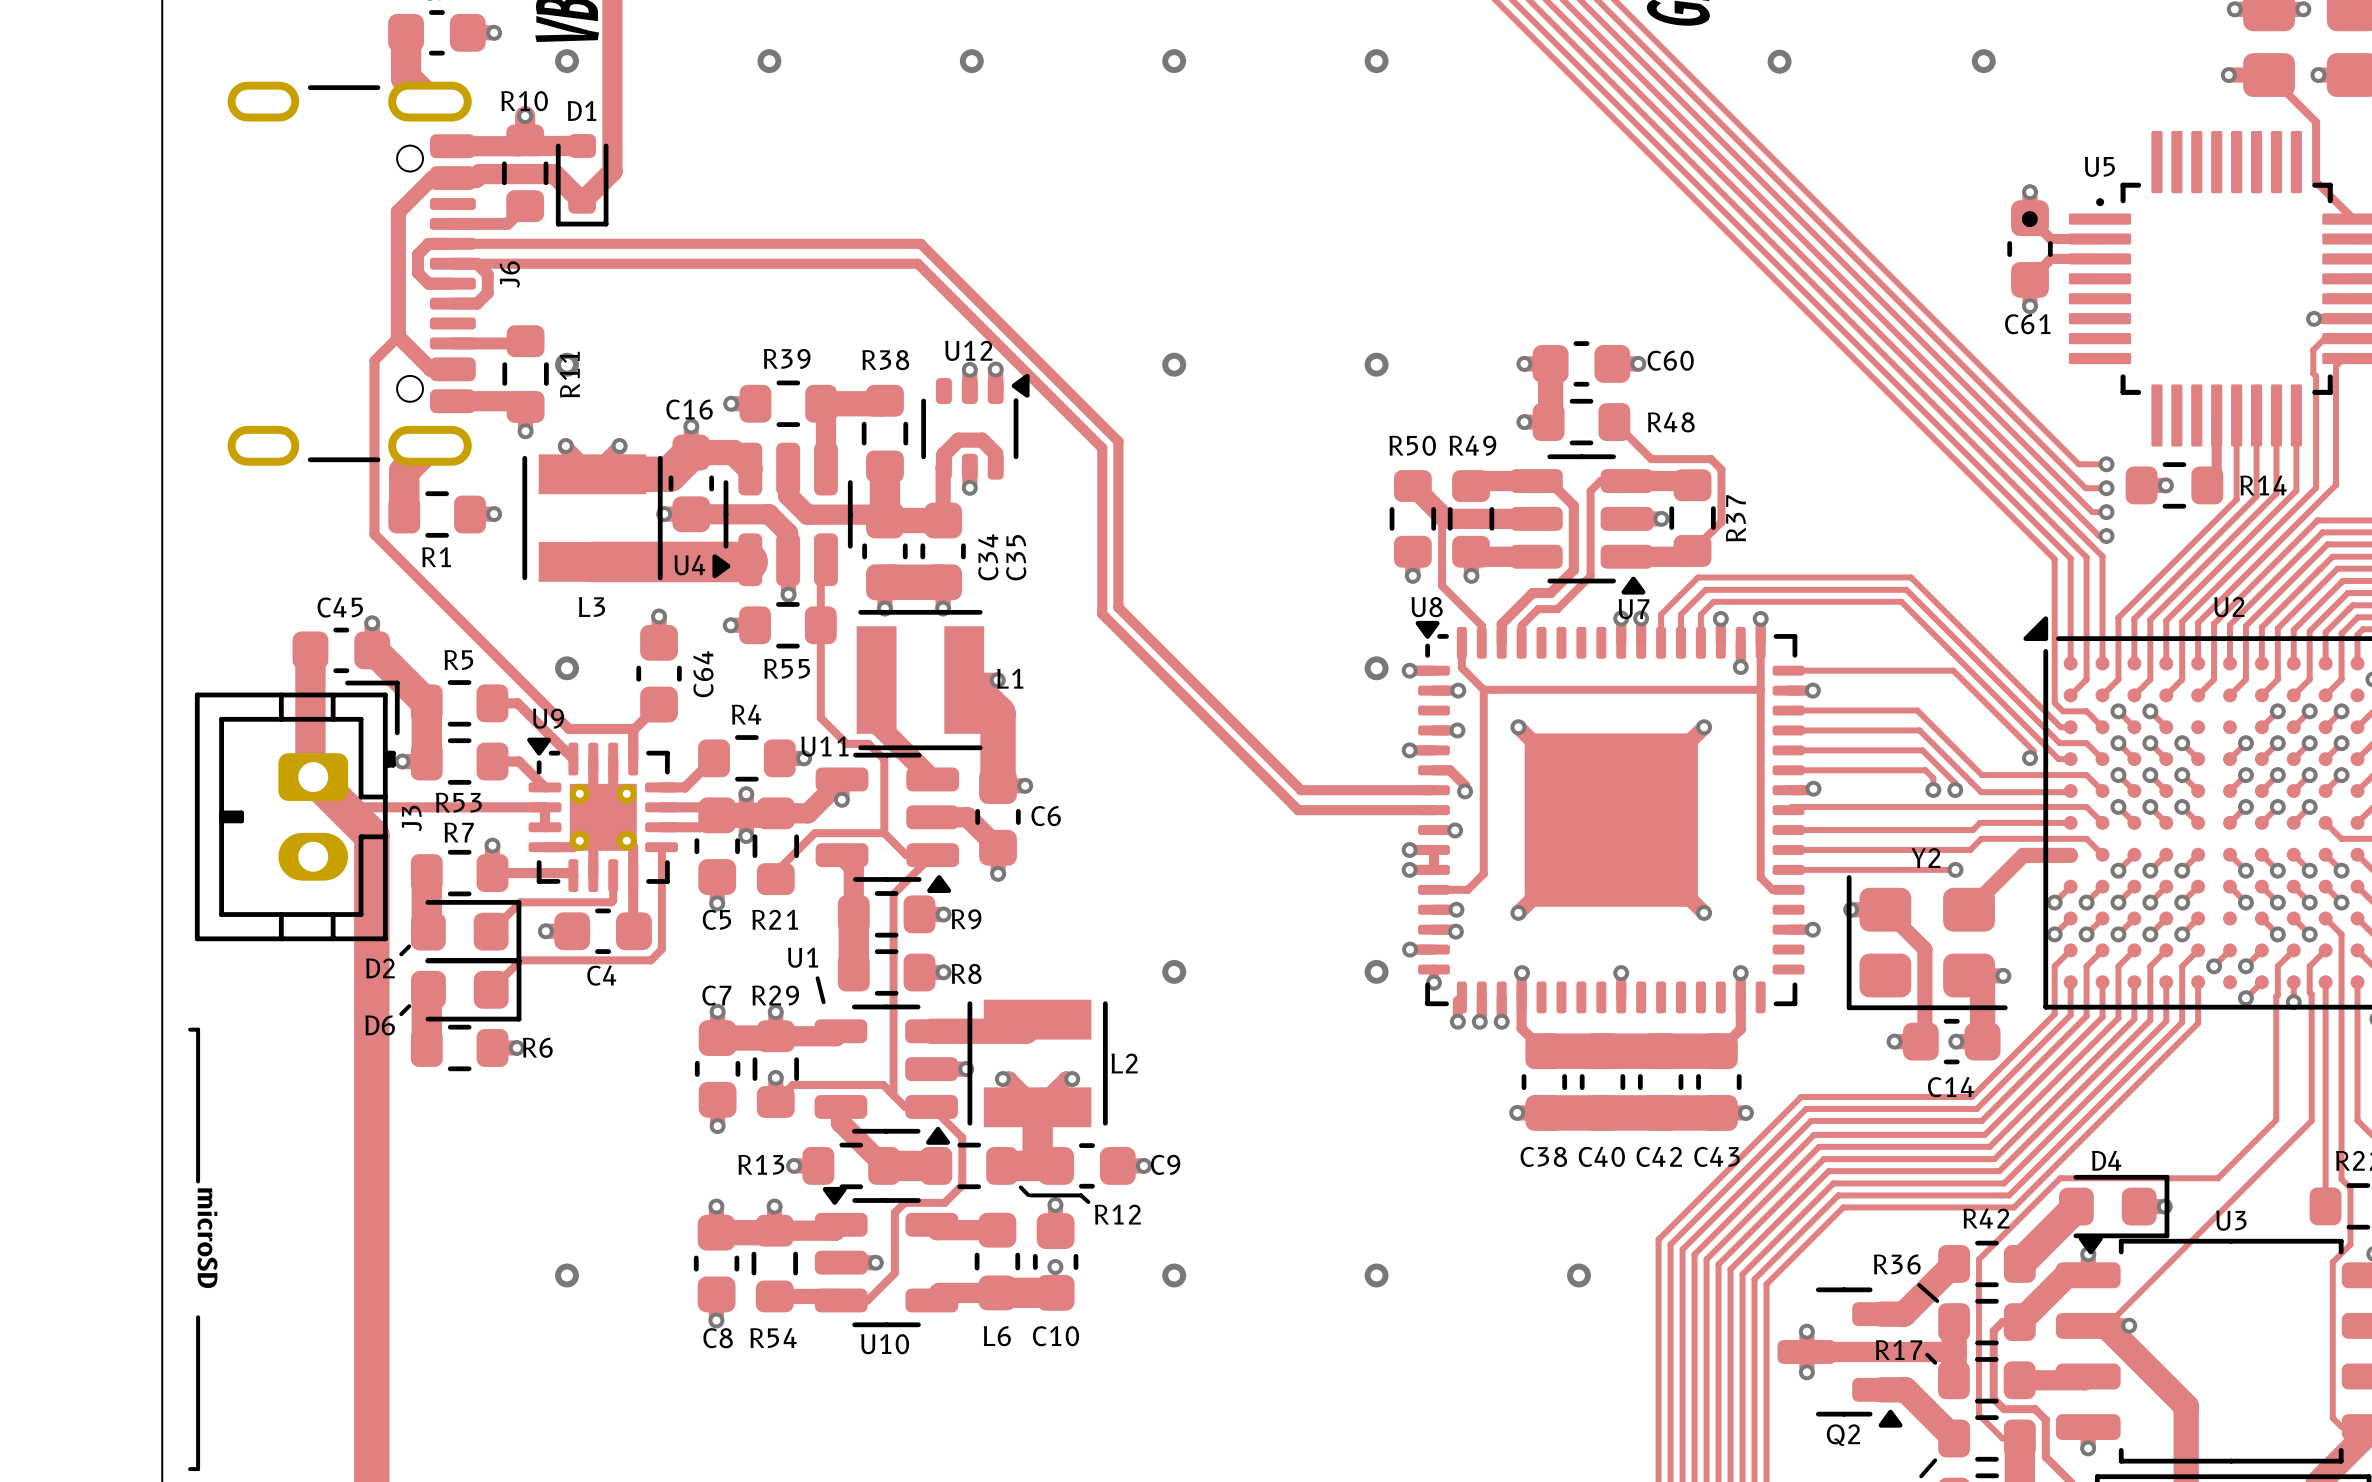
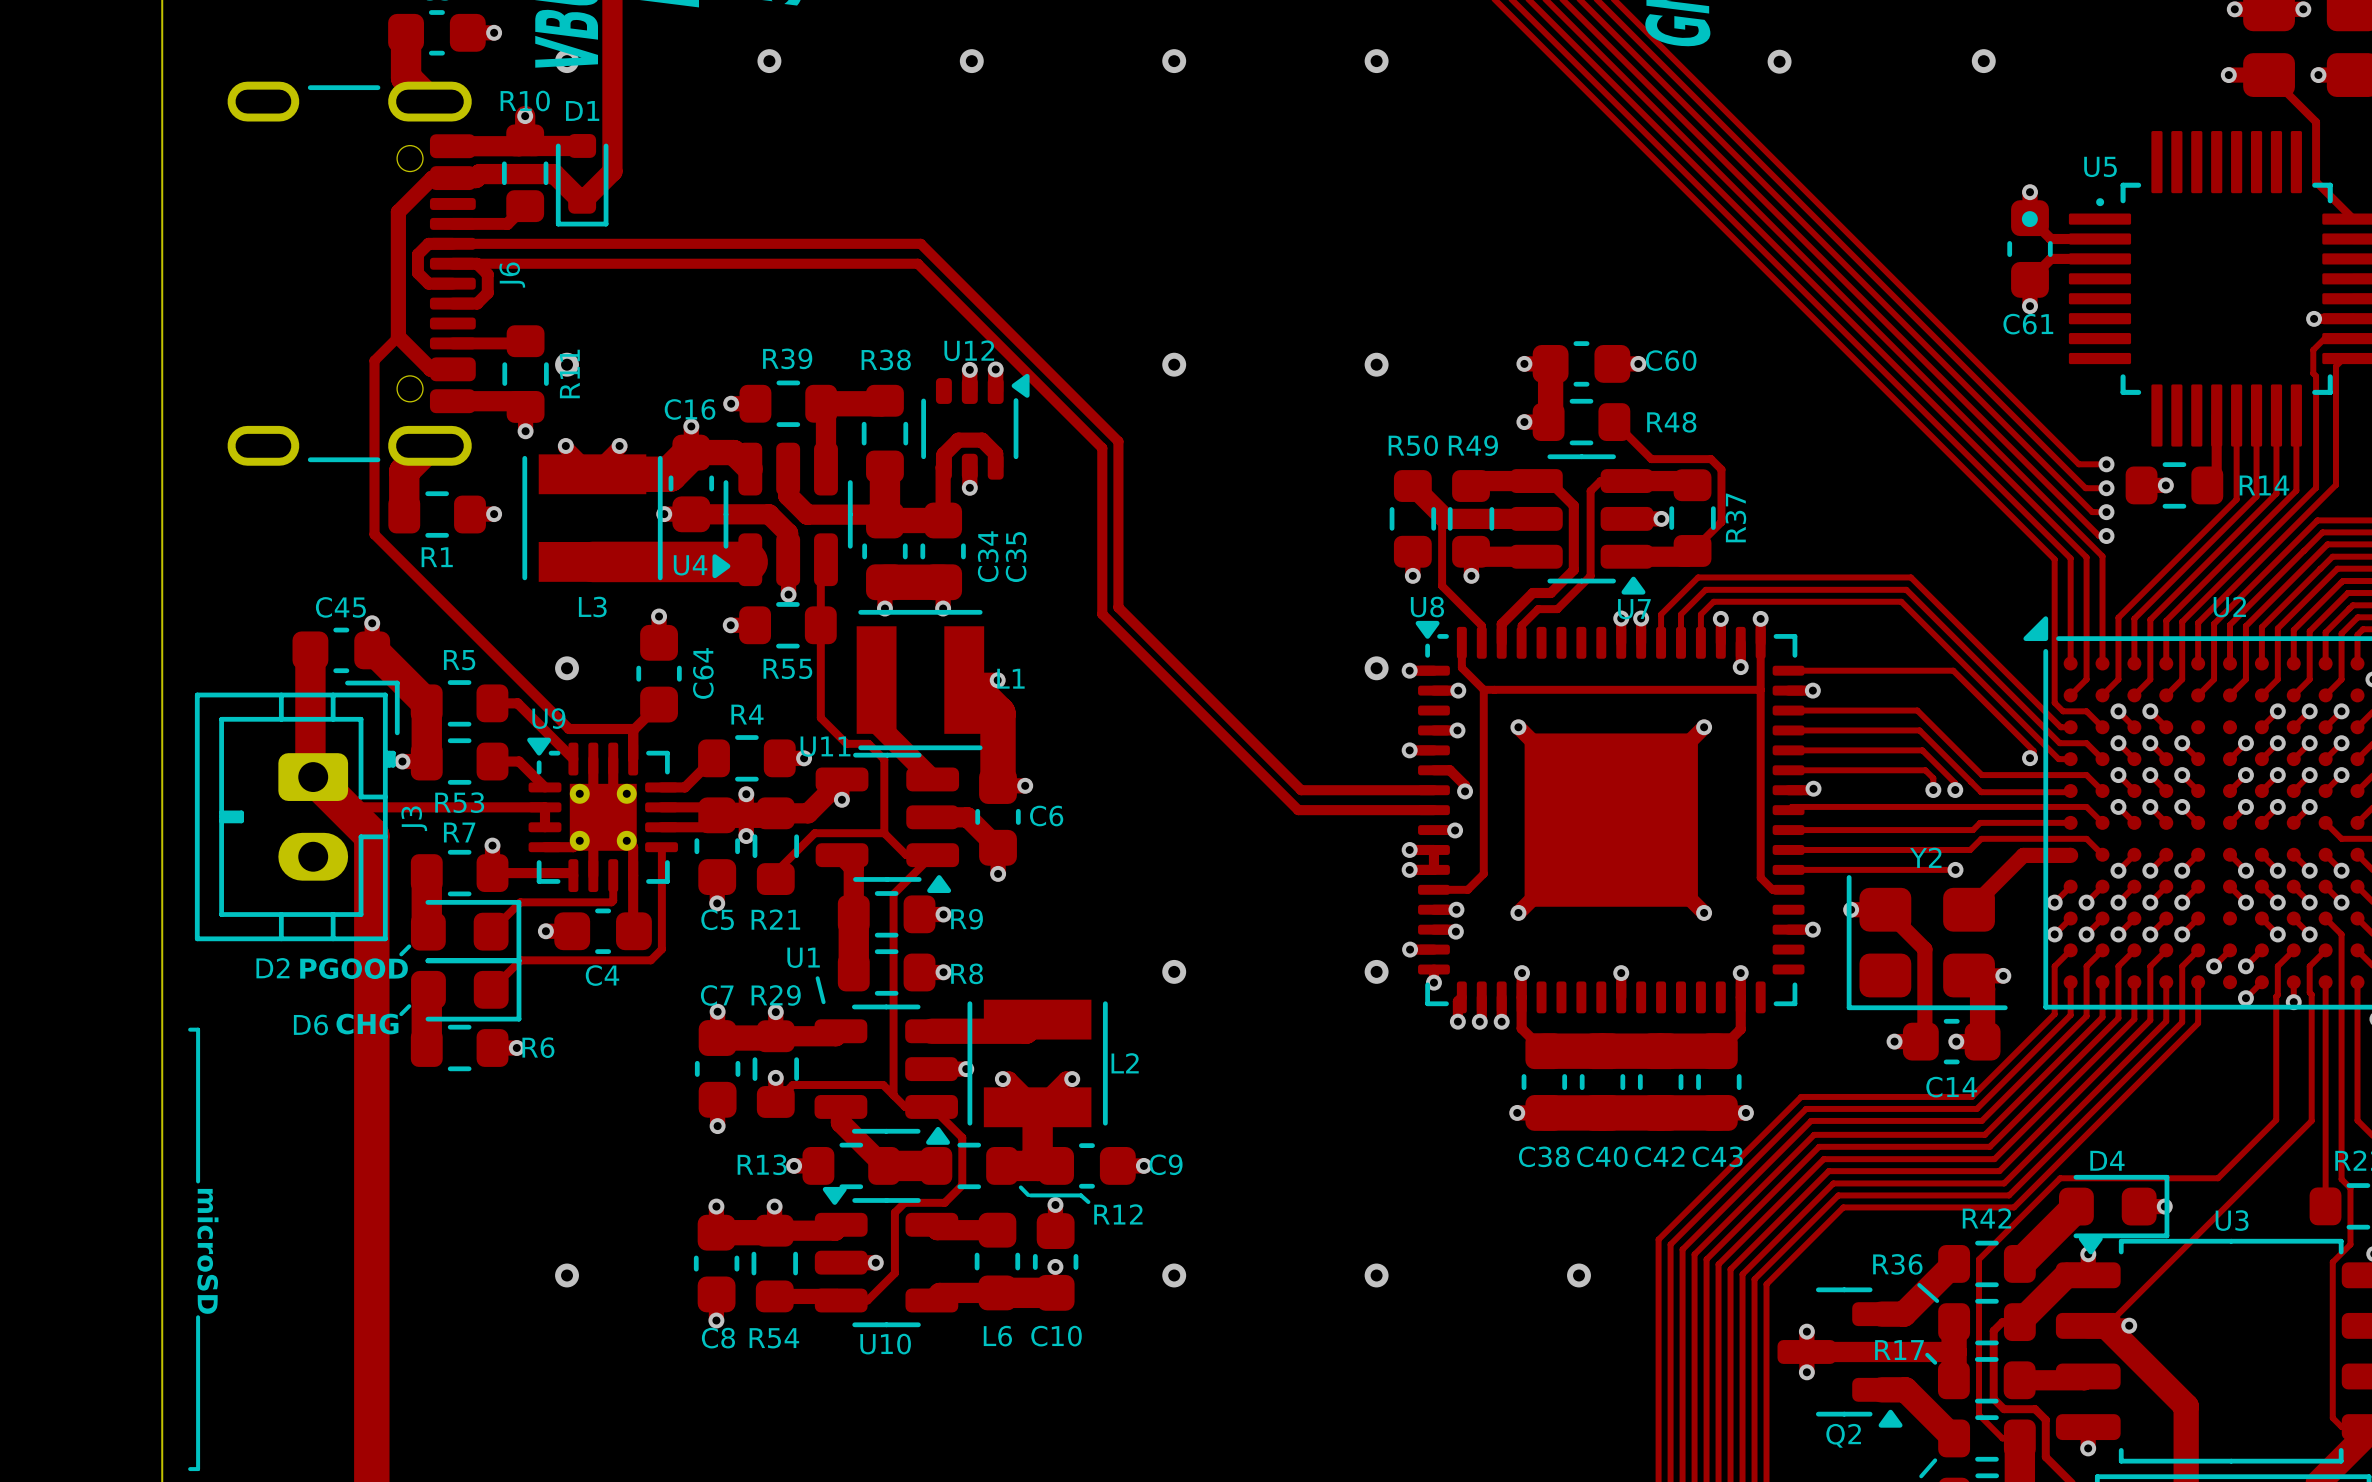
text: none -> PGOOD (354, 968)
D2 name position: D2 (380, 968) -> D2 (272, 968)
text: none -> CHG (367, 1024)
D6 name position: D6 (380, 1025) -> D6 (310, 1024)

